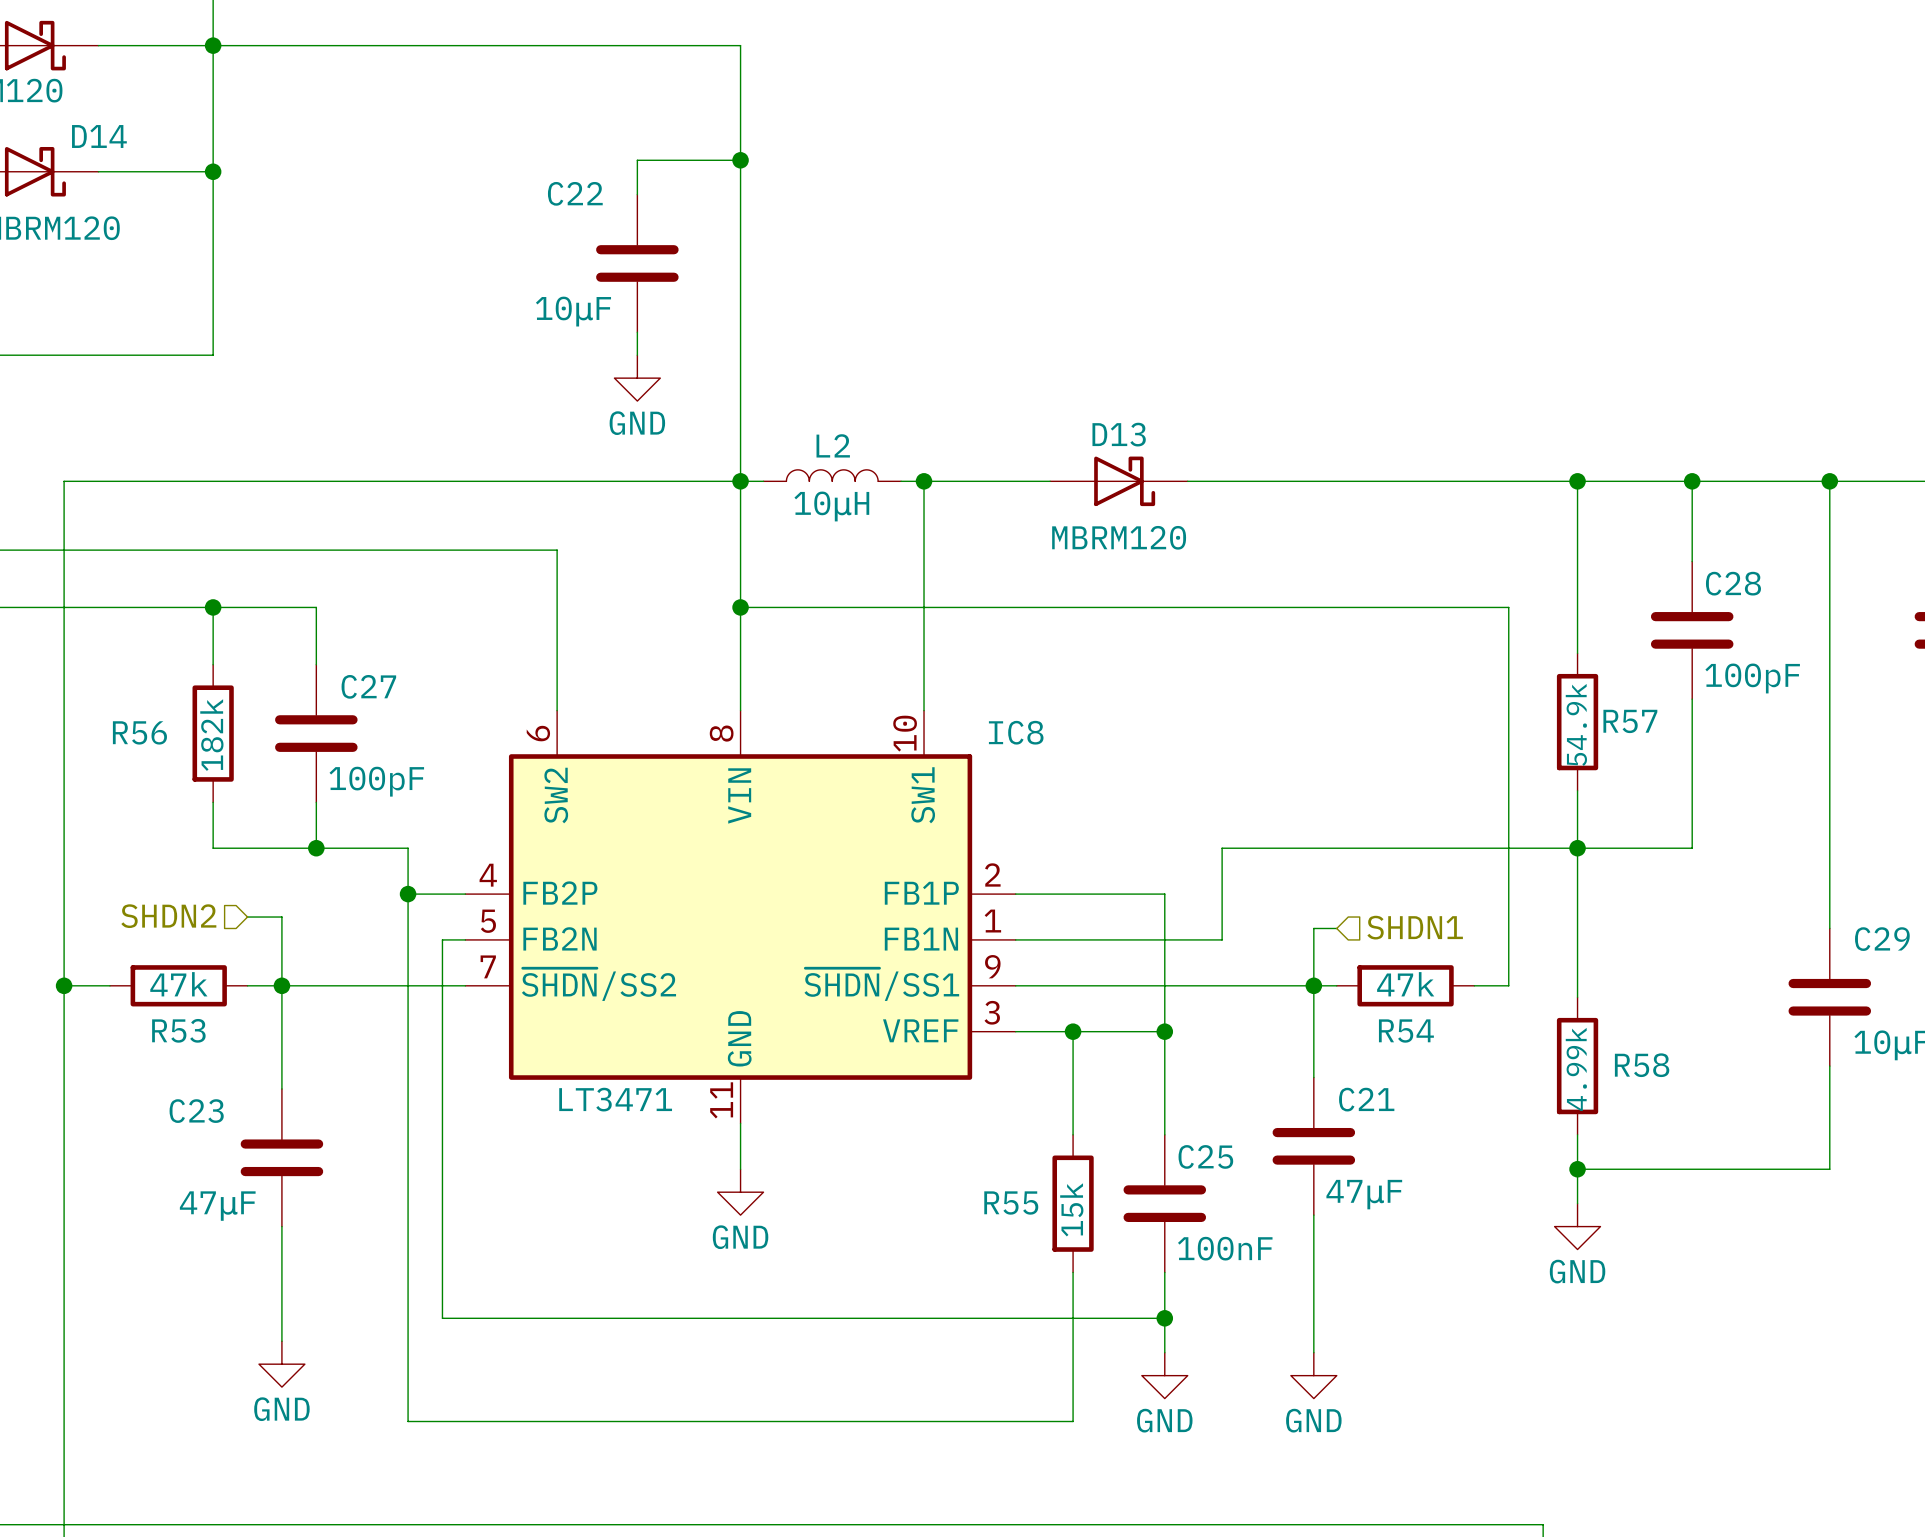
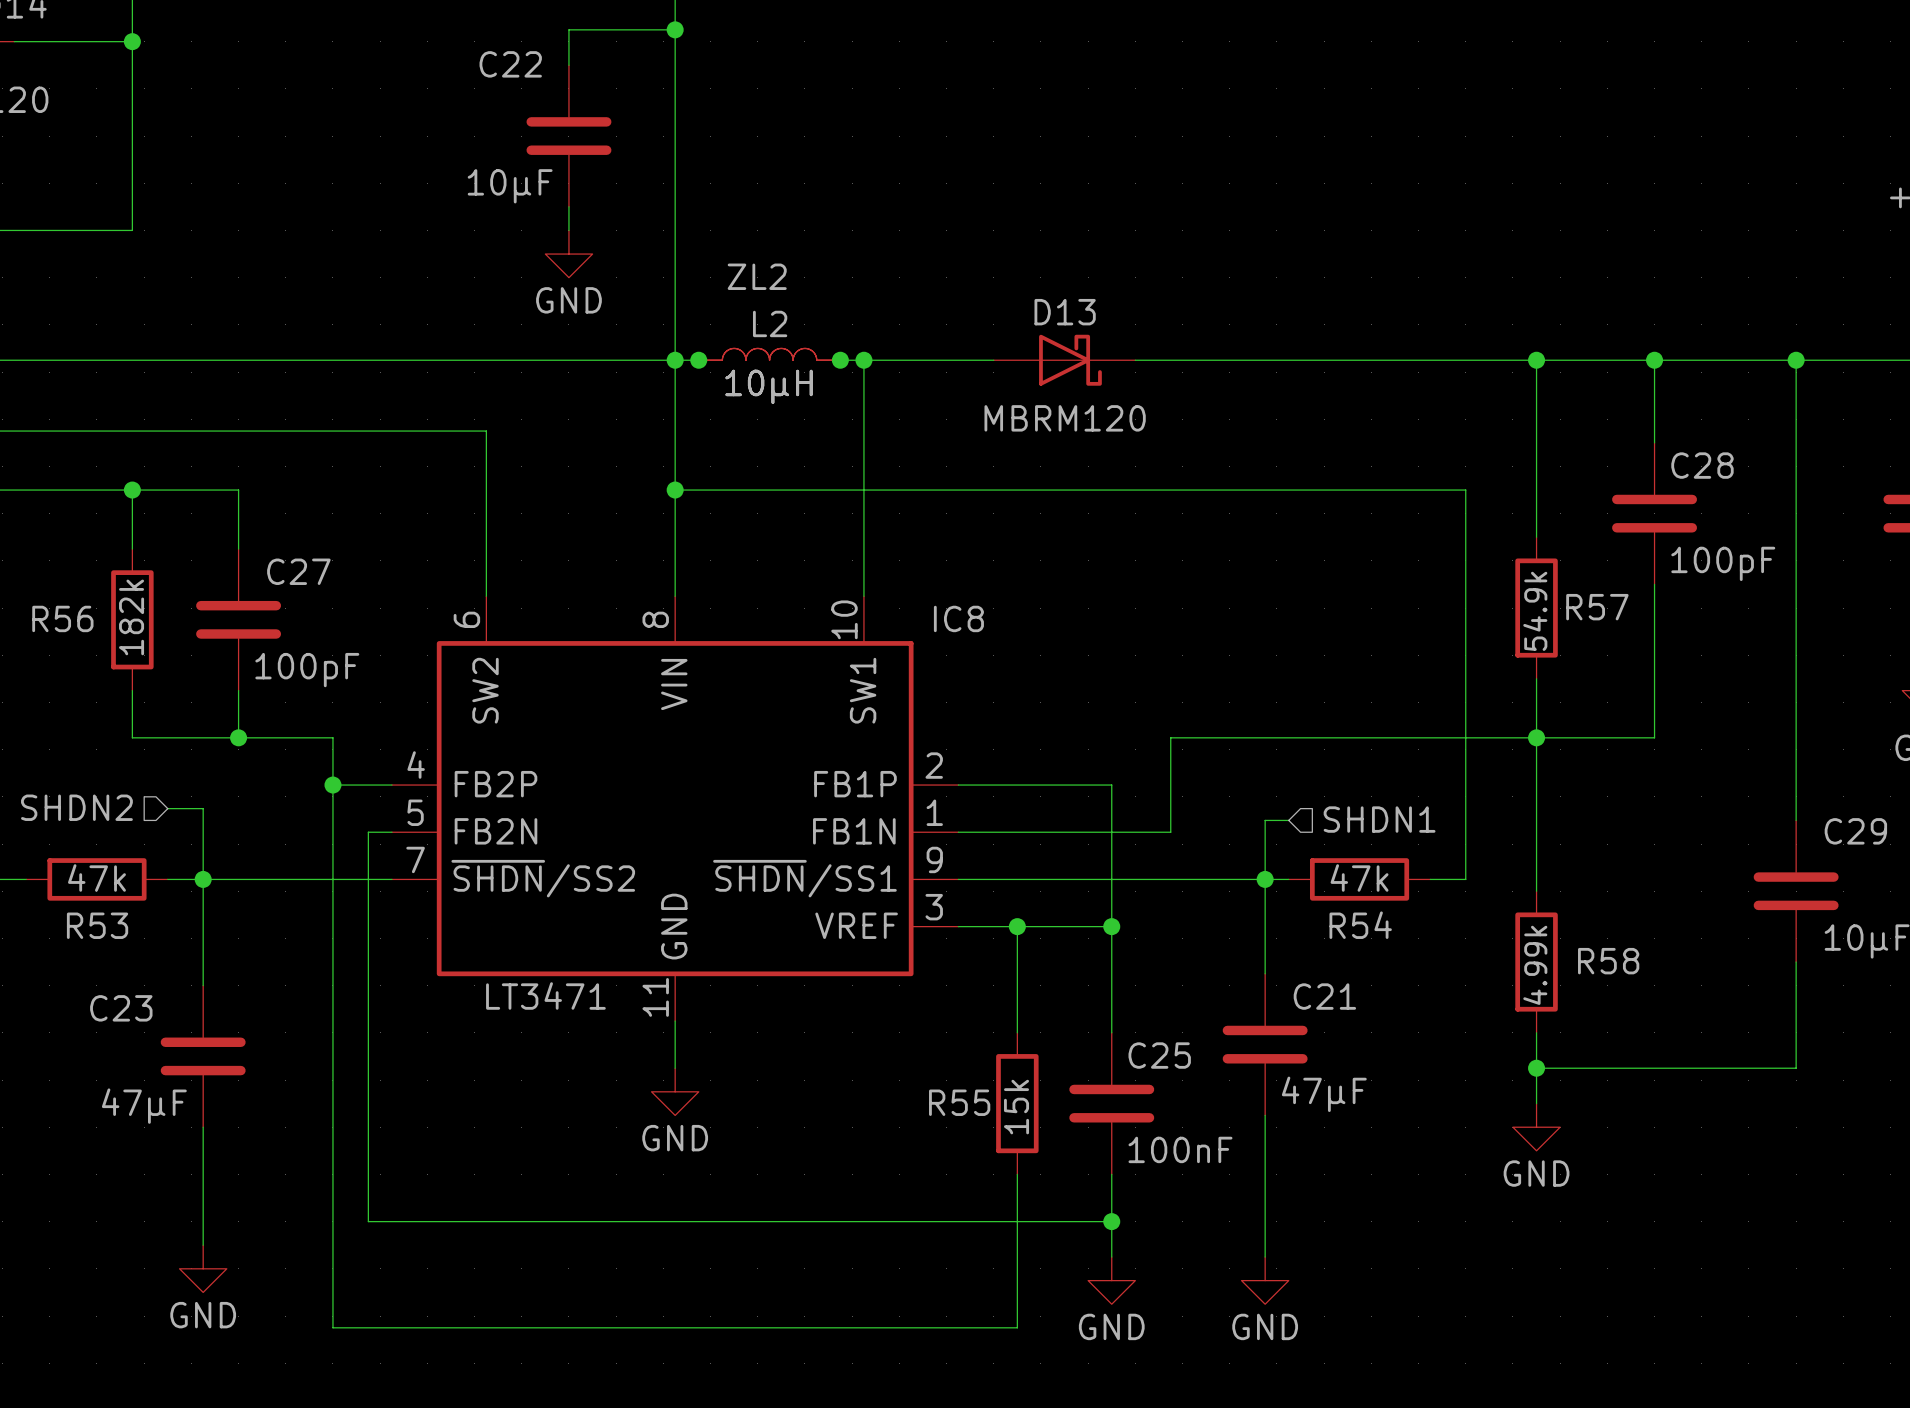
ZL2: none -> 10μH (769, 354)
junction: none -> (698, 360)
junction: none -> (840, 360)

